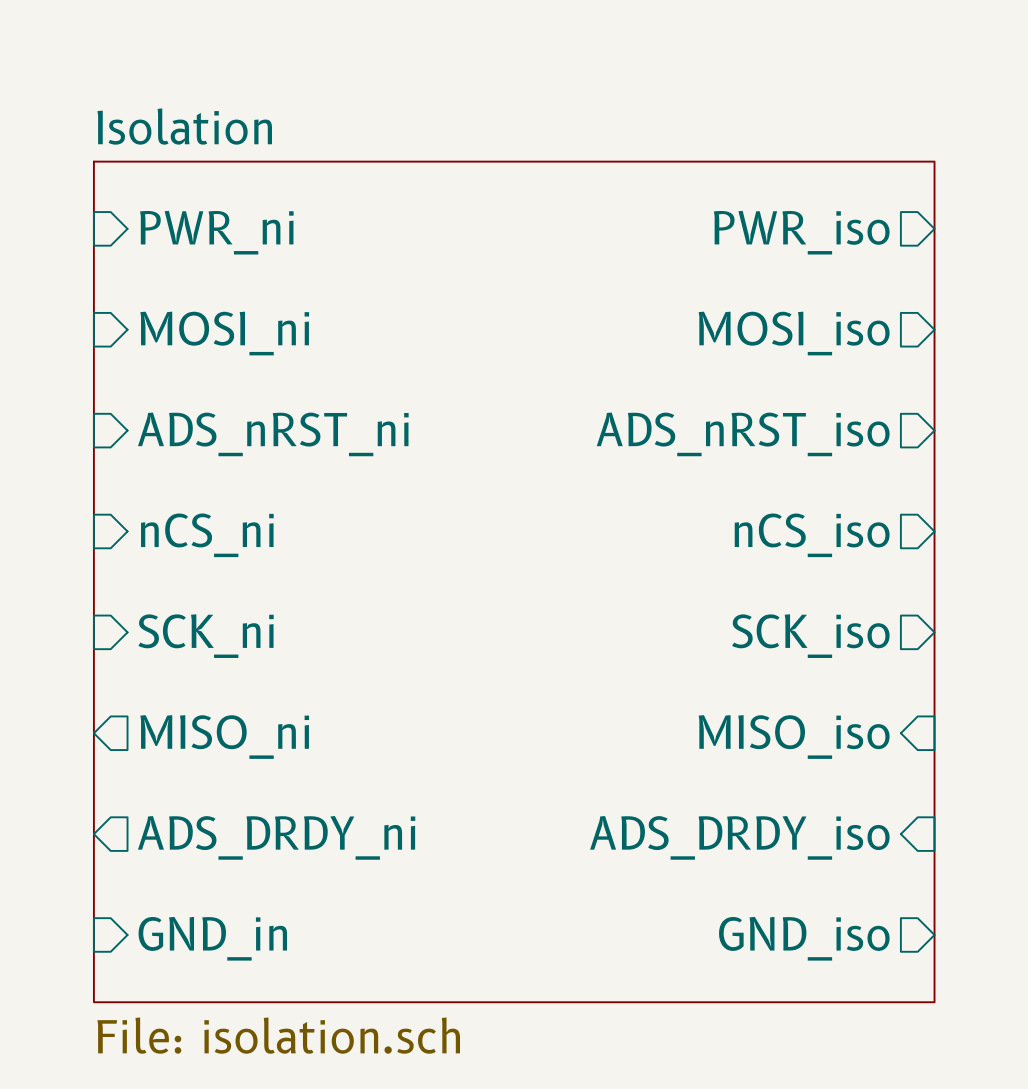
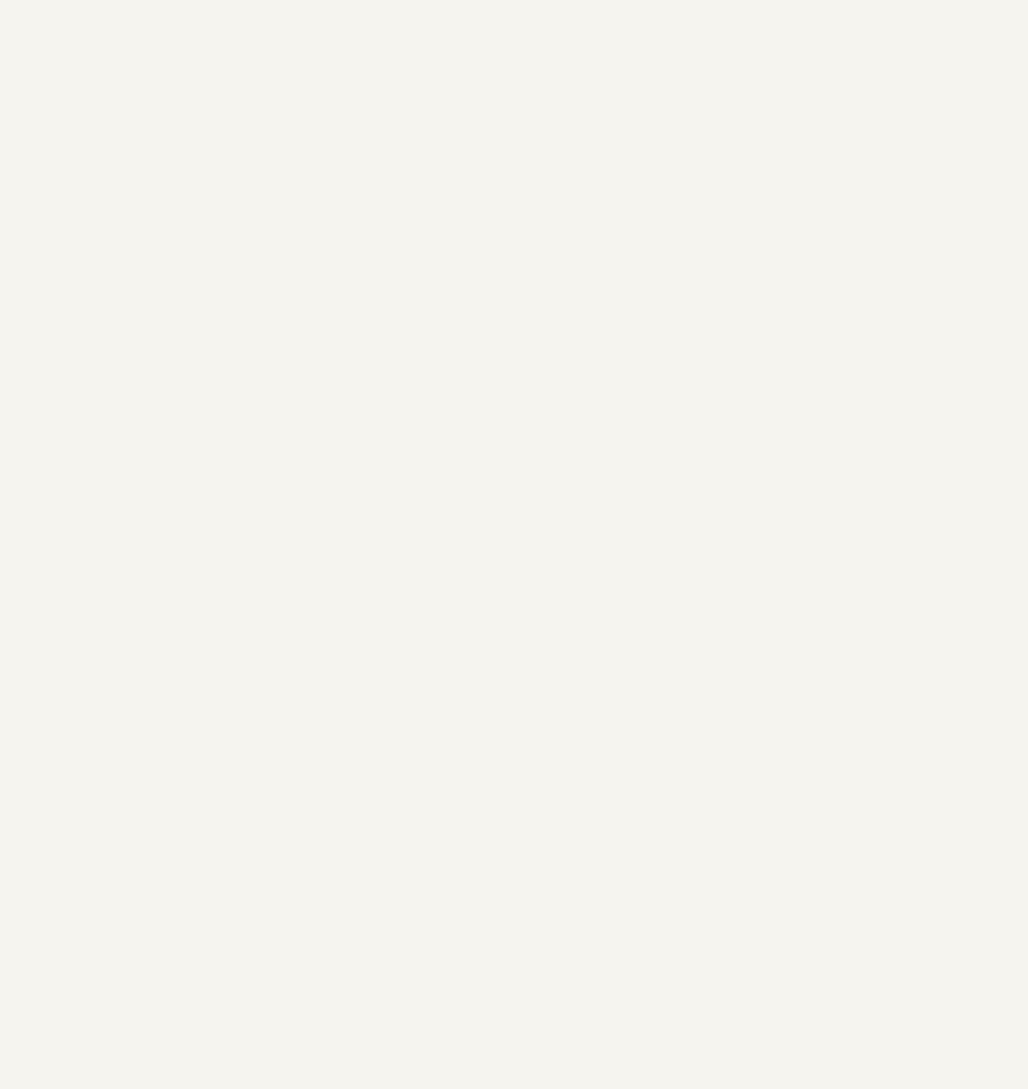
sheet pin: PWR_ni (216, 232) -> none
sheet pin: PWR_iso (801, 232) -> none
sheet pin: MOSI_ni (224, 333) -> none
sheet pin: MOSI_iso (794, 333) -> none
sheet pin: ADS_nRST_ni (273, 434) -> none
sheet pin: ADS_nRST_iso (743, 434) -> none
sheet pin: nCS_ni (207, 535) -> none
sheet pin: nCS_iso (812, 535) -> none
sheet Isolation: File: isolation.sch (514, 581) -> none
sheet pin: SCK_ni (206, 636) -> none
sheet pin: SCK_iso (810, 636) -> none
sheet pin: MISO_ni (224, 737) -> none
sheet pin: MISO_iso (794, 737) -> none
sheet pin: ADS_DRDY_ni (276, 837) -> none
sheet pin: ADS_DRDY_iso (739, 837) -> none
sheet pin: GND_in (212, 938) -> none
sheet pin: GND_iso (804, 938) -> none

